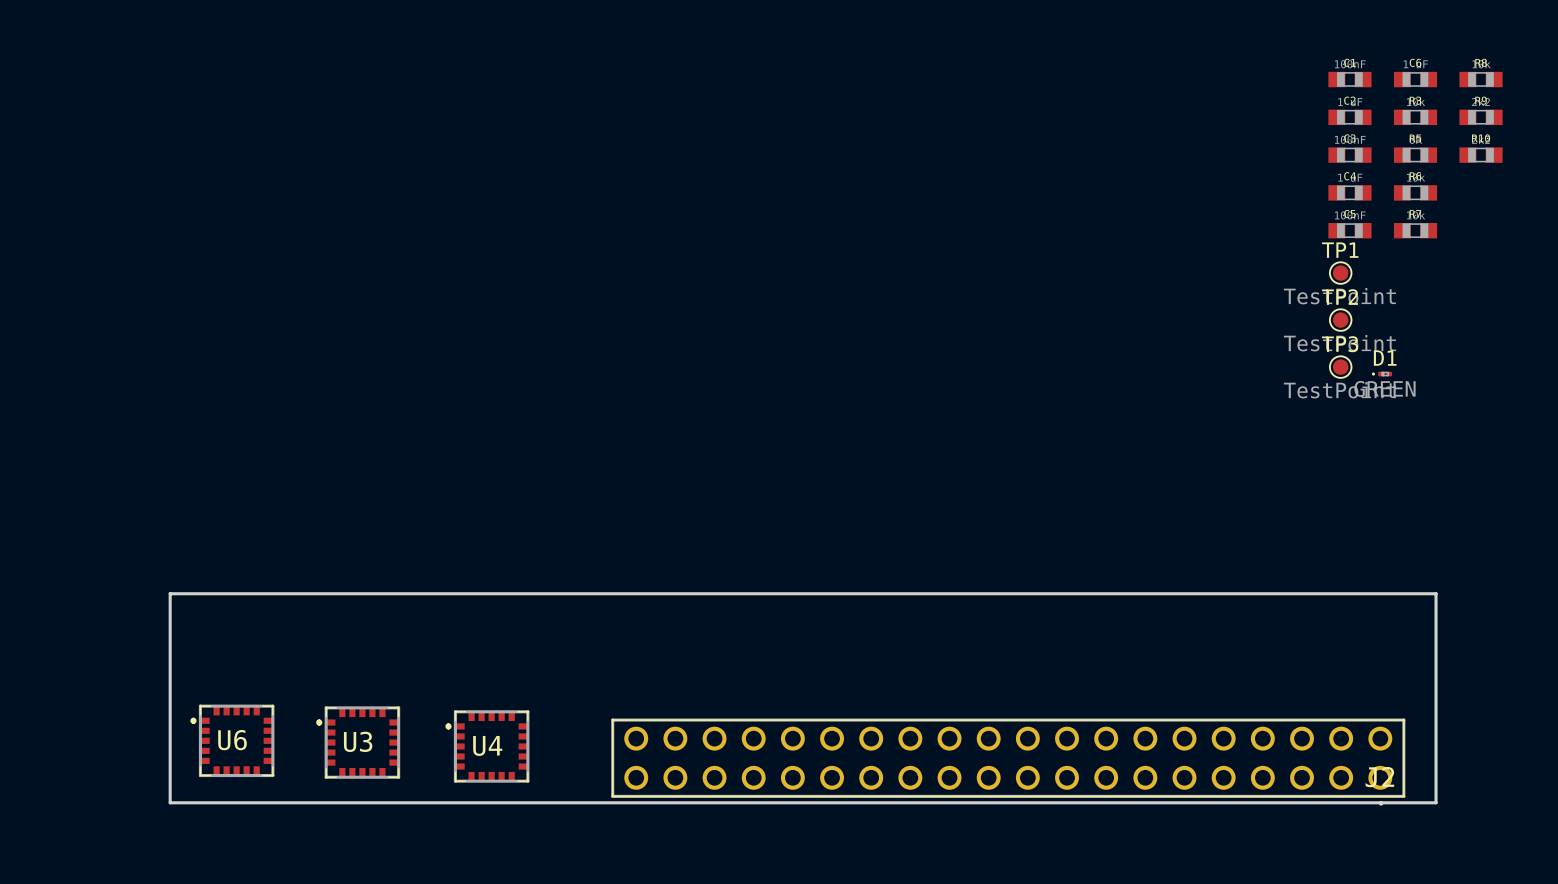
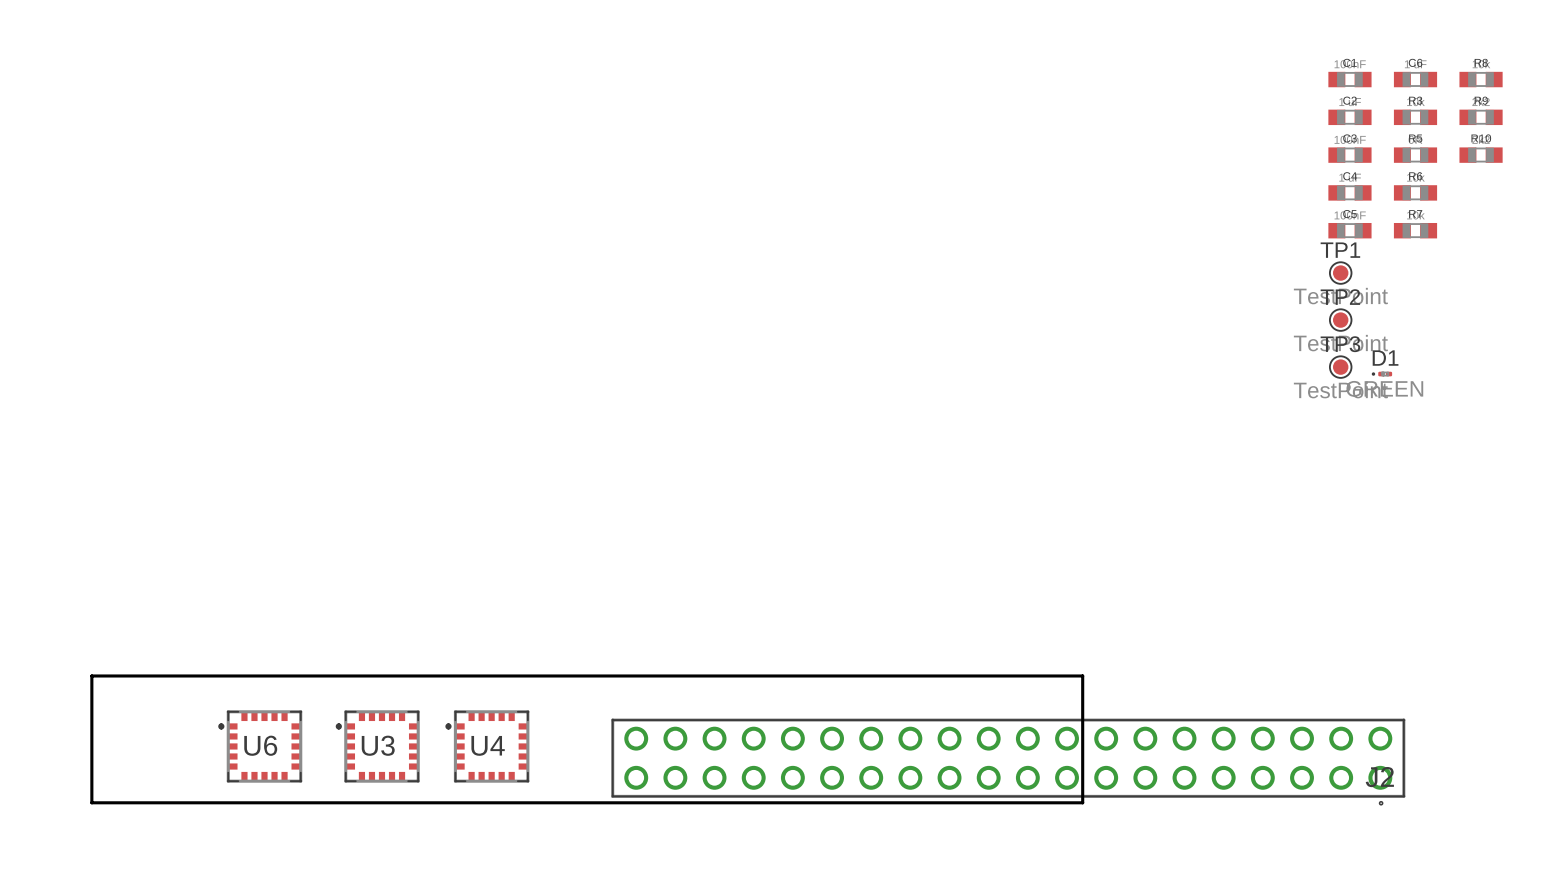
U6 position: (232, 740) -> (260, 746)
U3 position: (358, 742) -> (377, 746)
board edge: (170, 802) (170, 593) (1436, 593) (1436, 802) (1082, 802) -> (170, 802) (91, 802) (91, 675) (1082, 675) (1082, 802)

